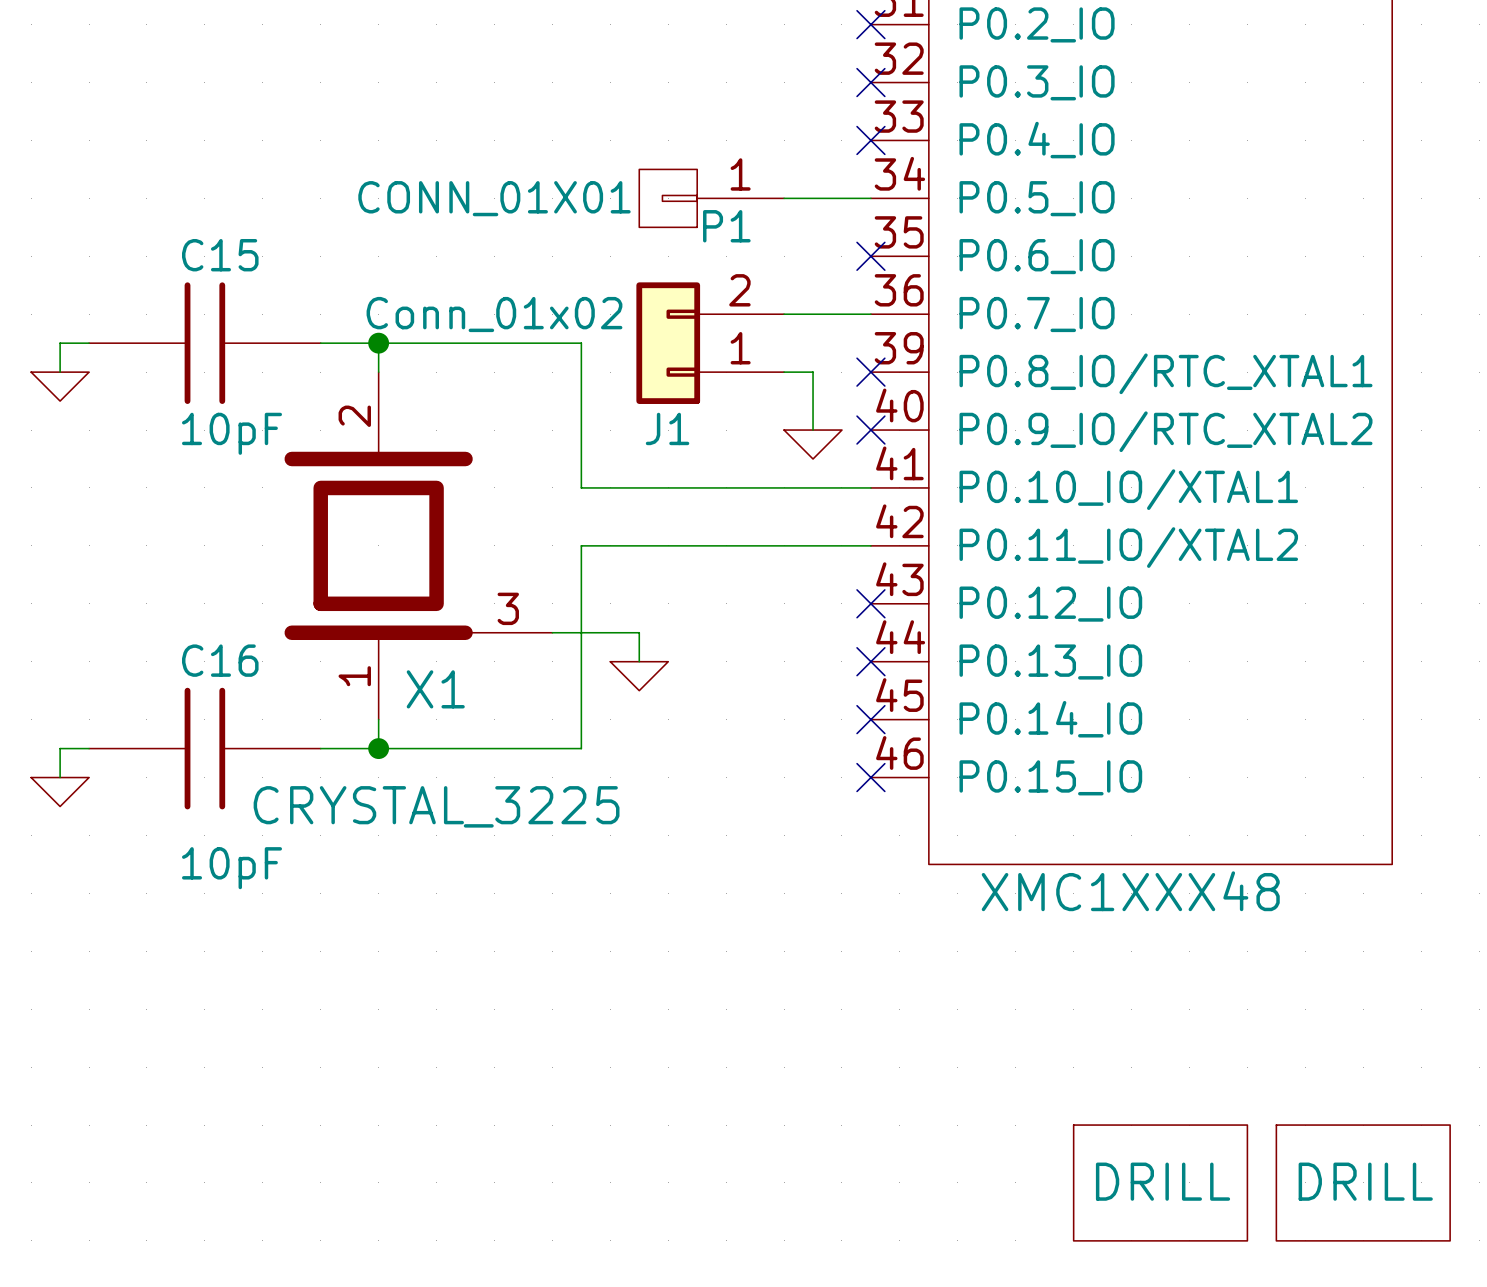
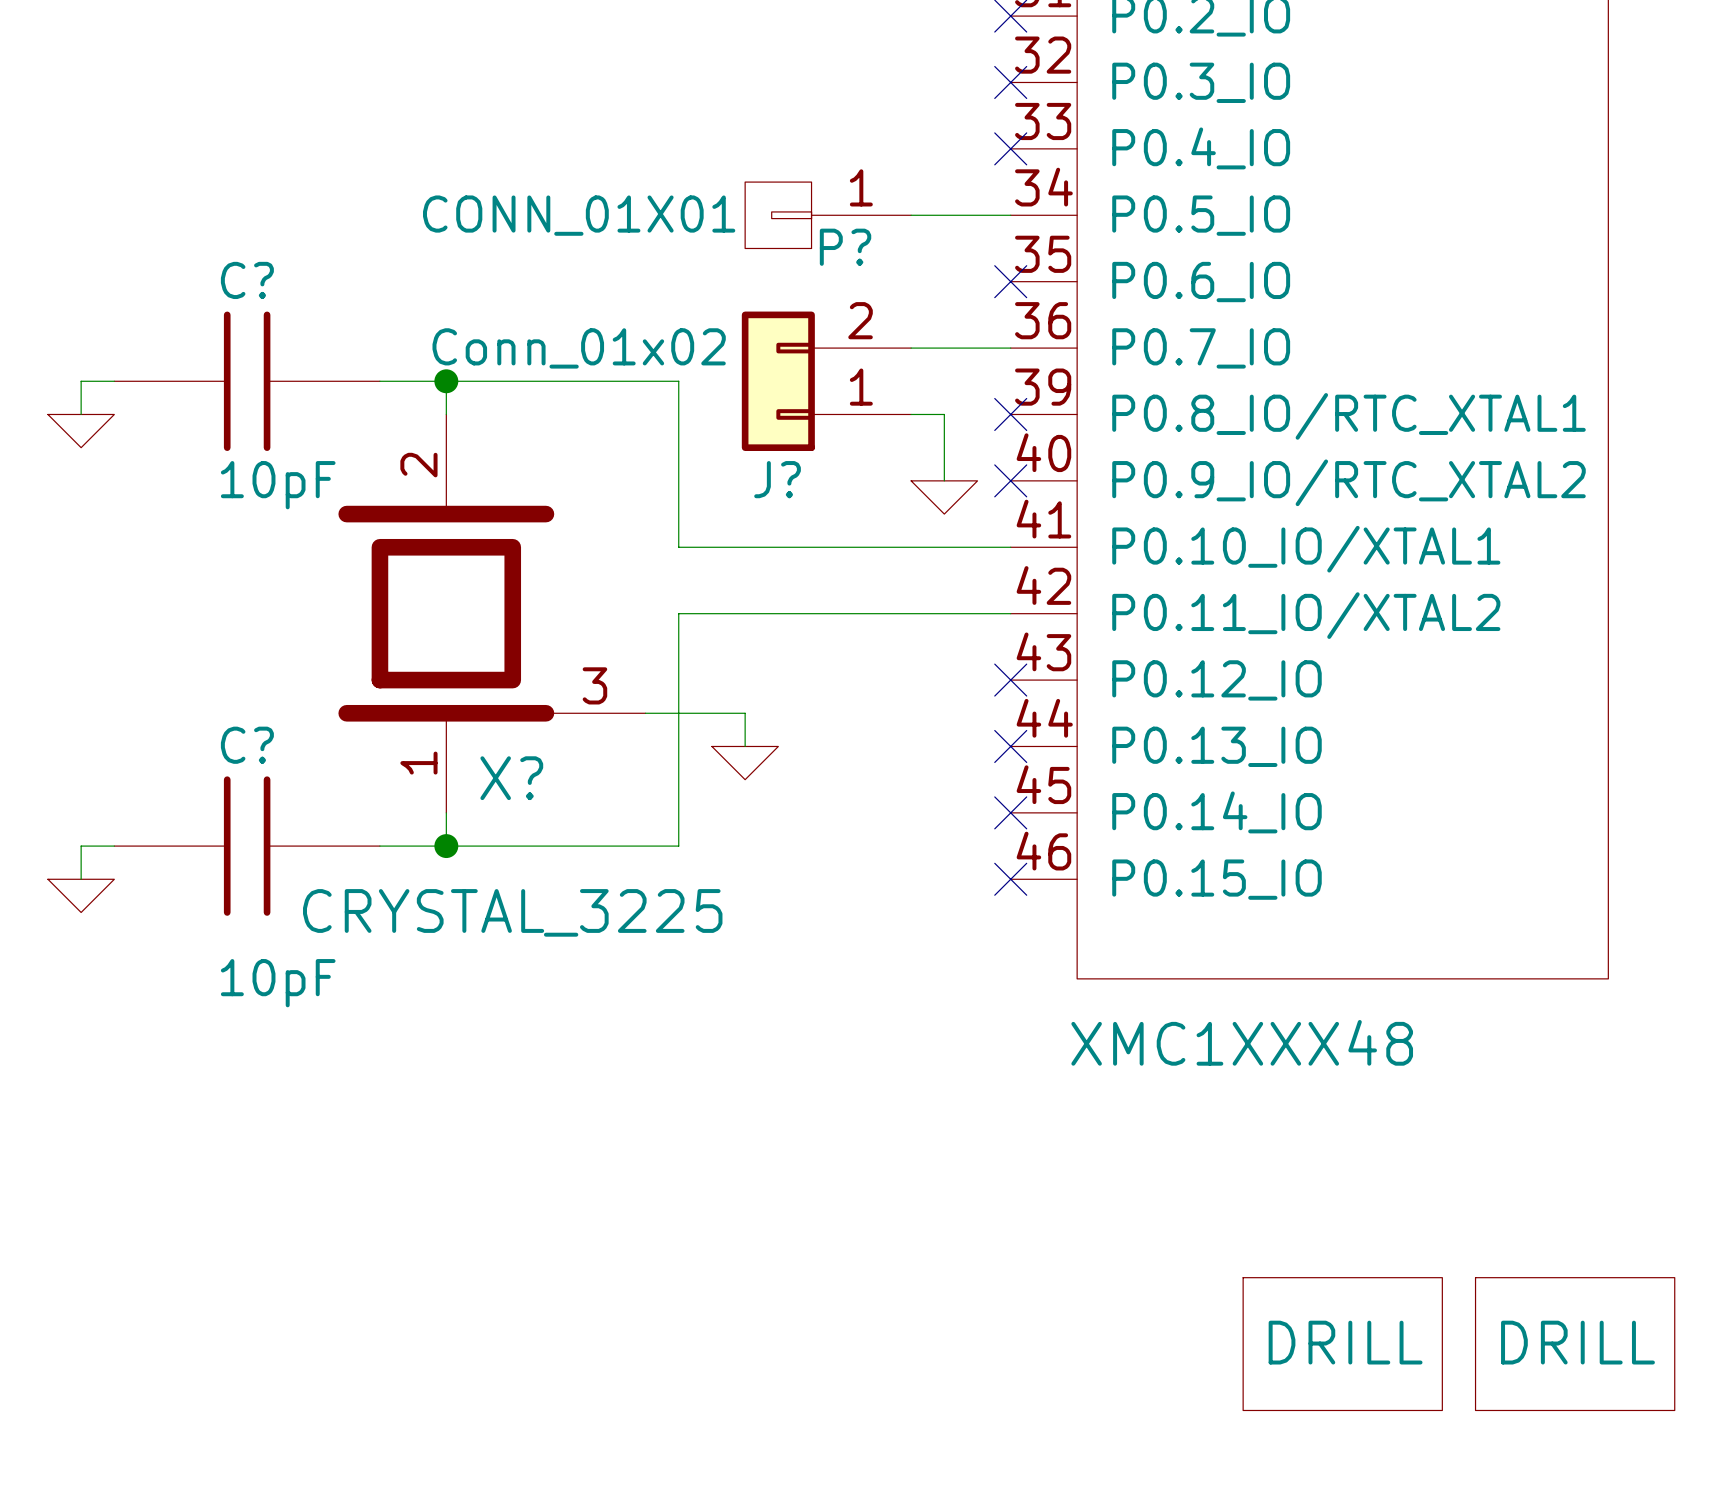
P1 name: P1 (726, 226) -> P? (845, 247)
C15 name: C15 (220, 255) -> C? (247, 280)
J1 name: J1 (667, 428) -> J? (777, 479)
C16 name: C16 (220, 660) -> C? (247, 745)
X1 name: X1 (435, 689) -> X? (511, 778)
part value position: XMC1XXX48 (1130, 891) -> XMC1XXX48 (1242, 1042)

